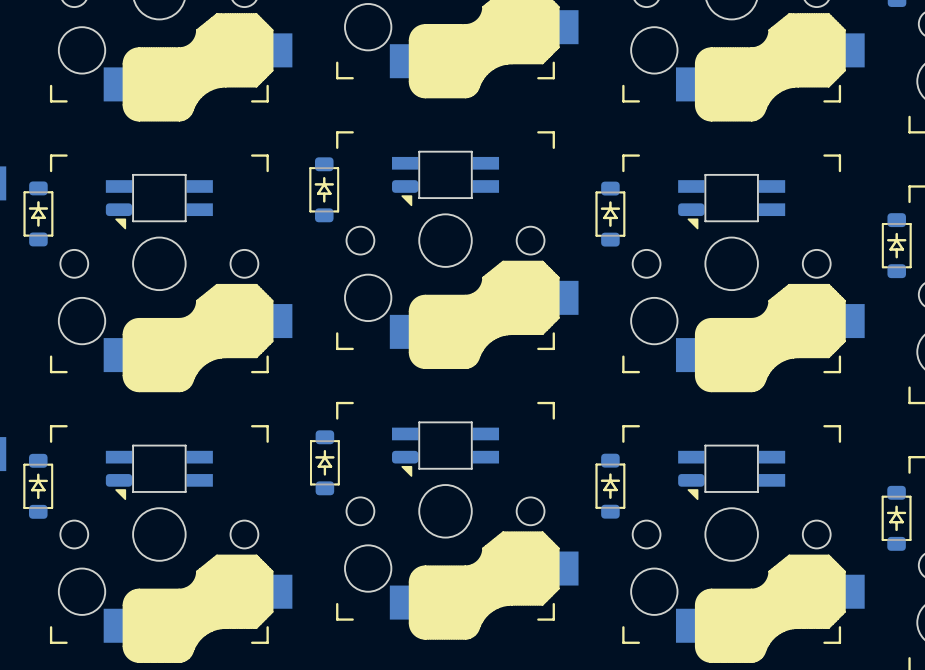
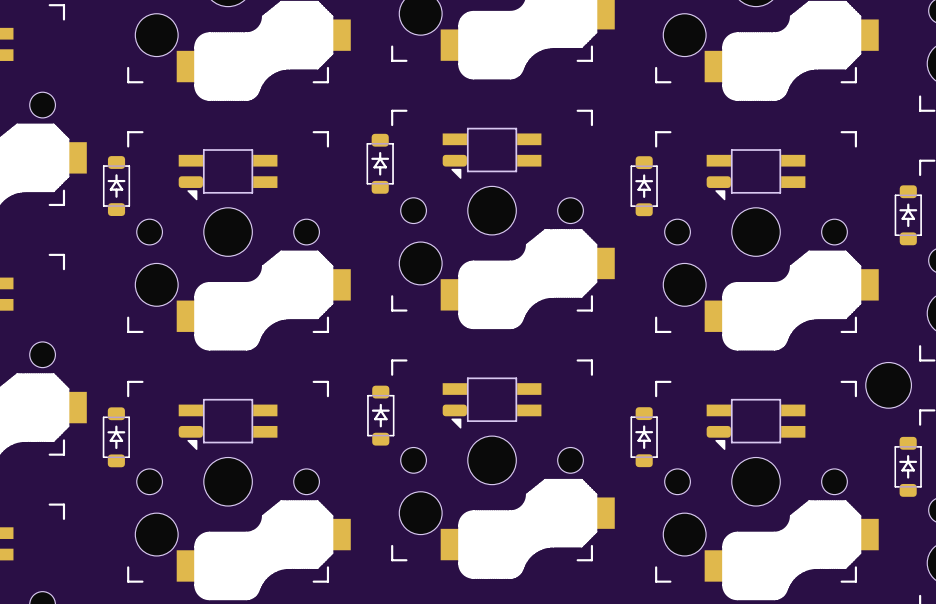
part: none -> (888, 385)

